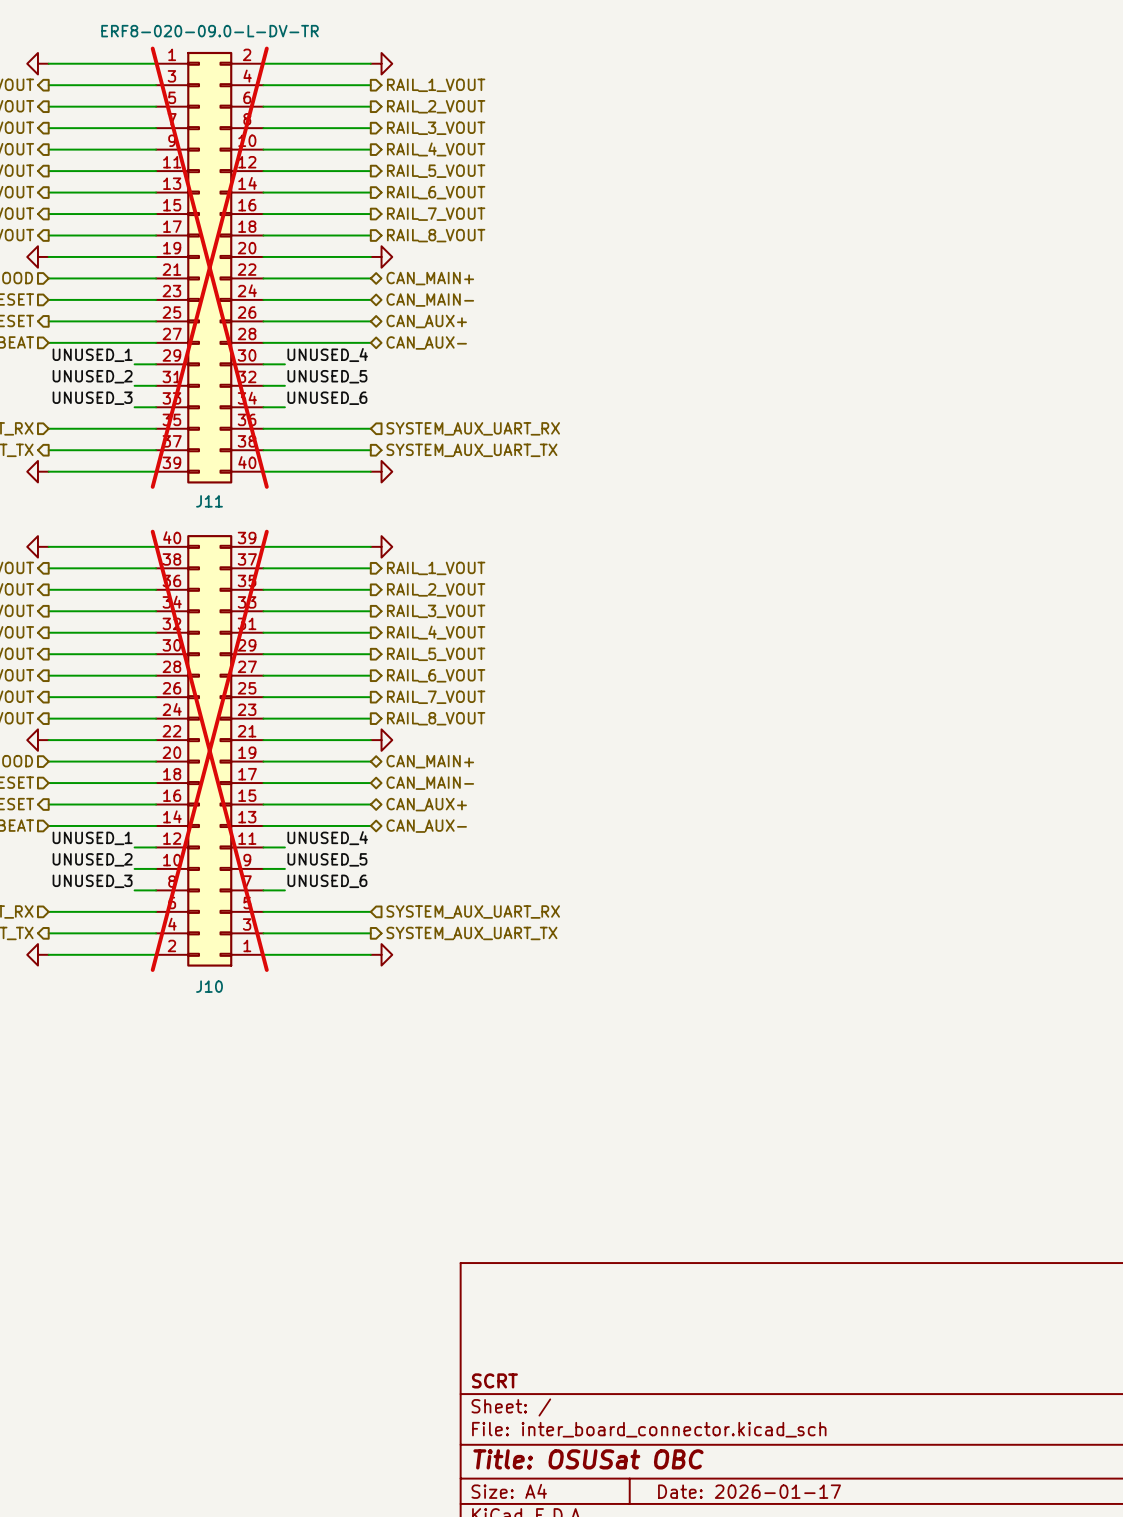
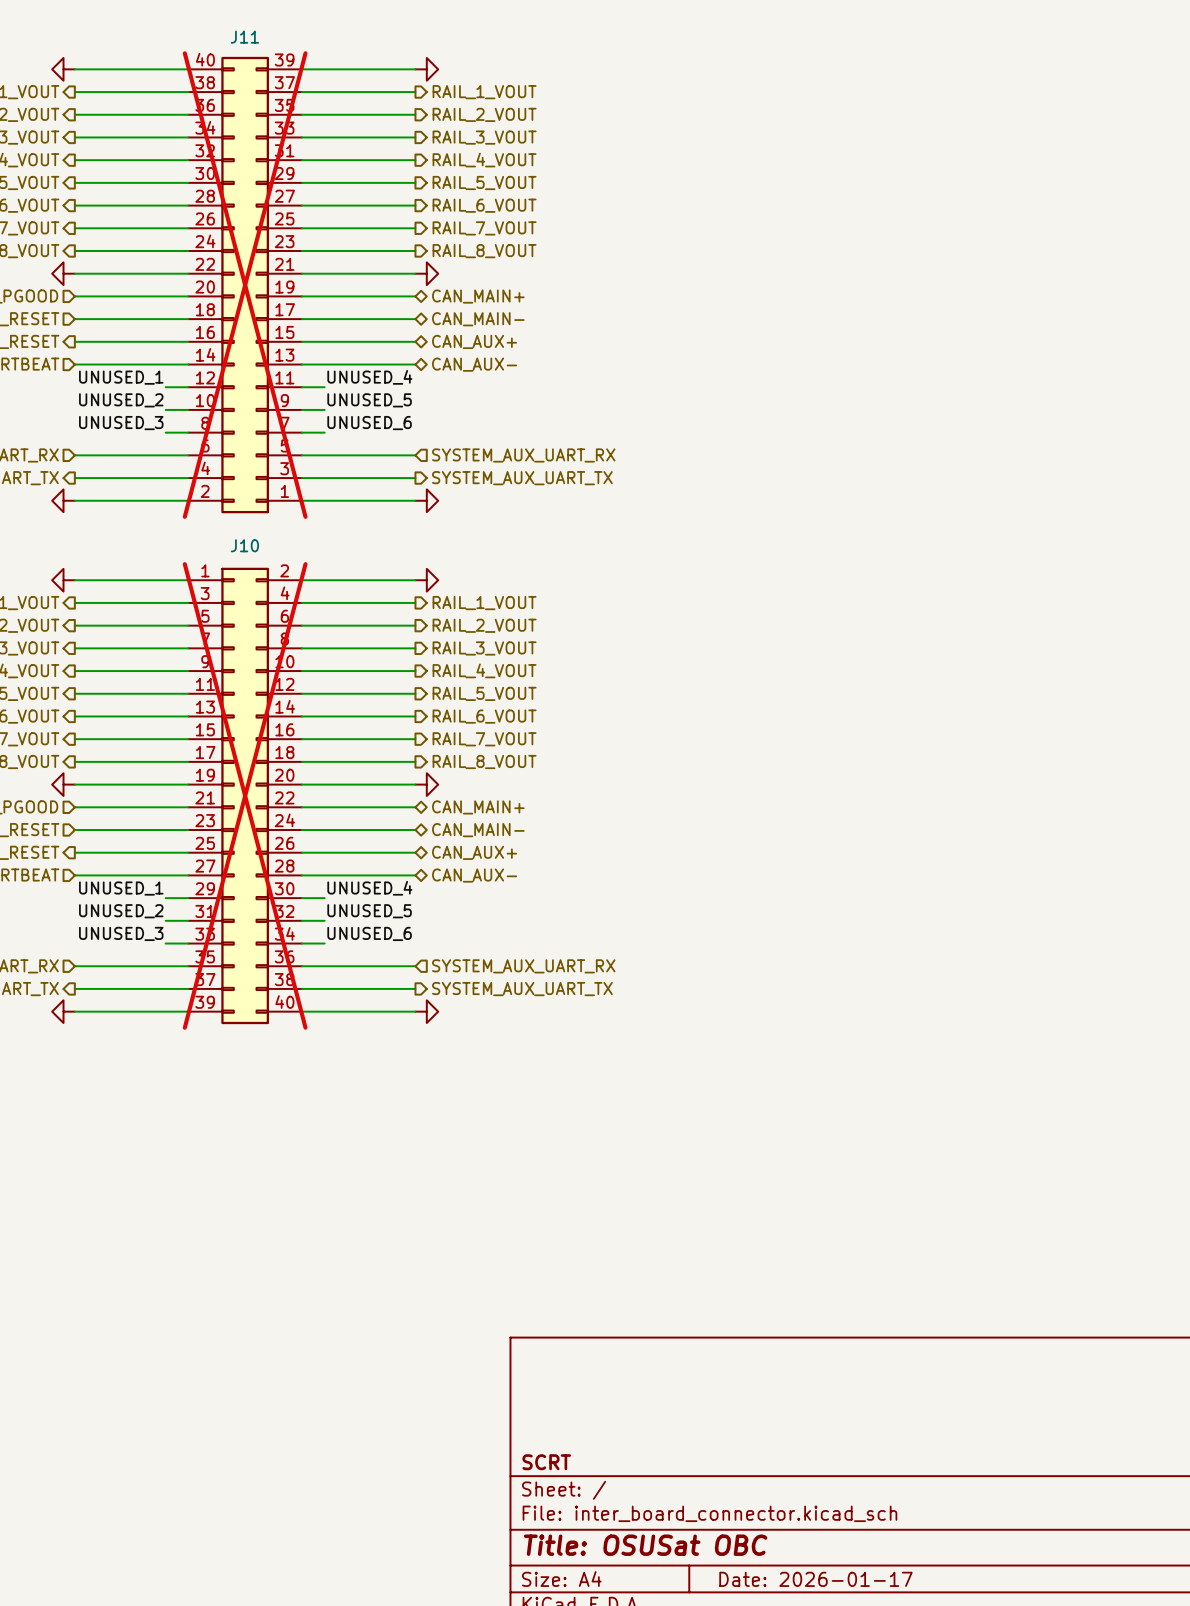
J11 value: ERF8-020-09.0-L-DV-TR (210, 31) -> none
J11 rotation: 0° (209, 267) -> 180° (245, 285)
J10 rotation: 0° (209, 750) -> 180° (245, 795)

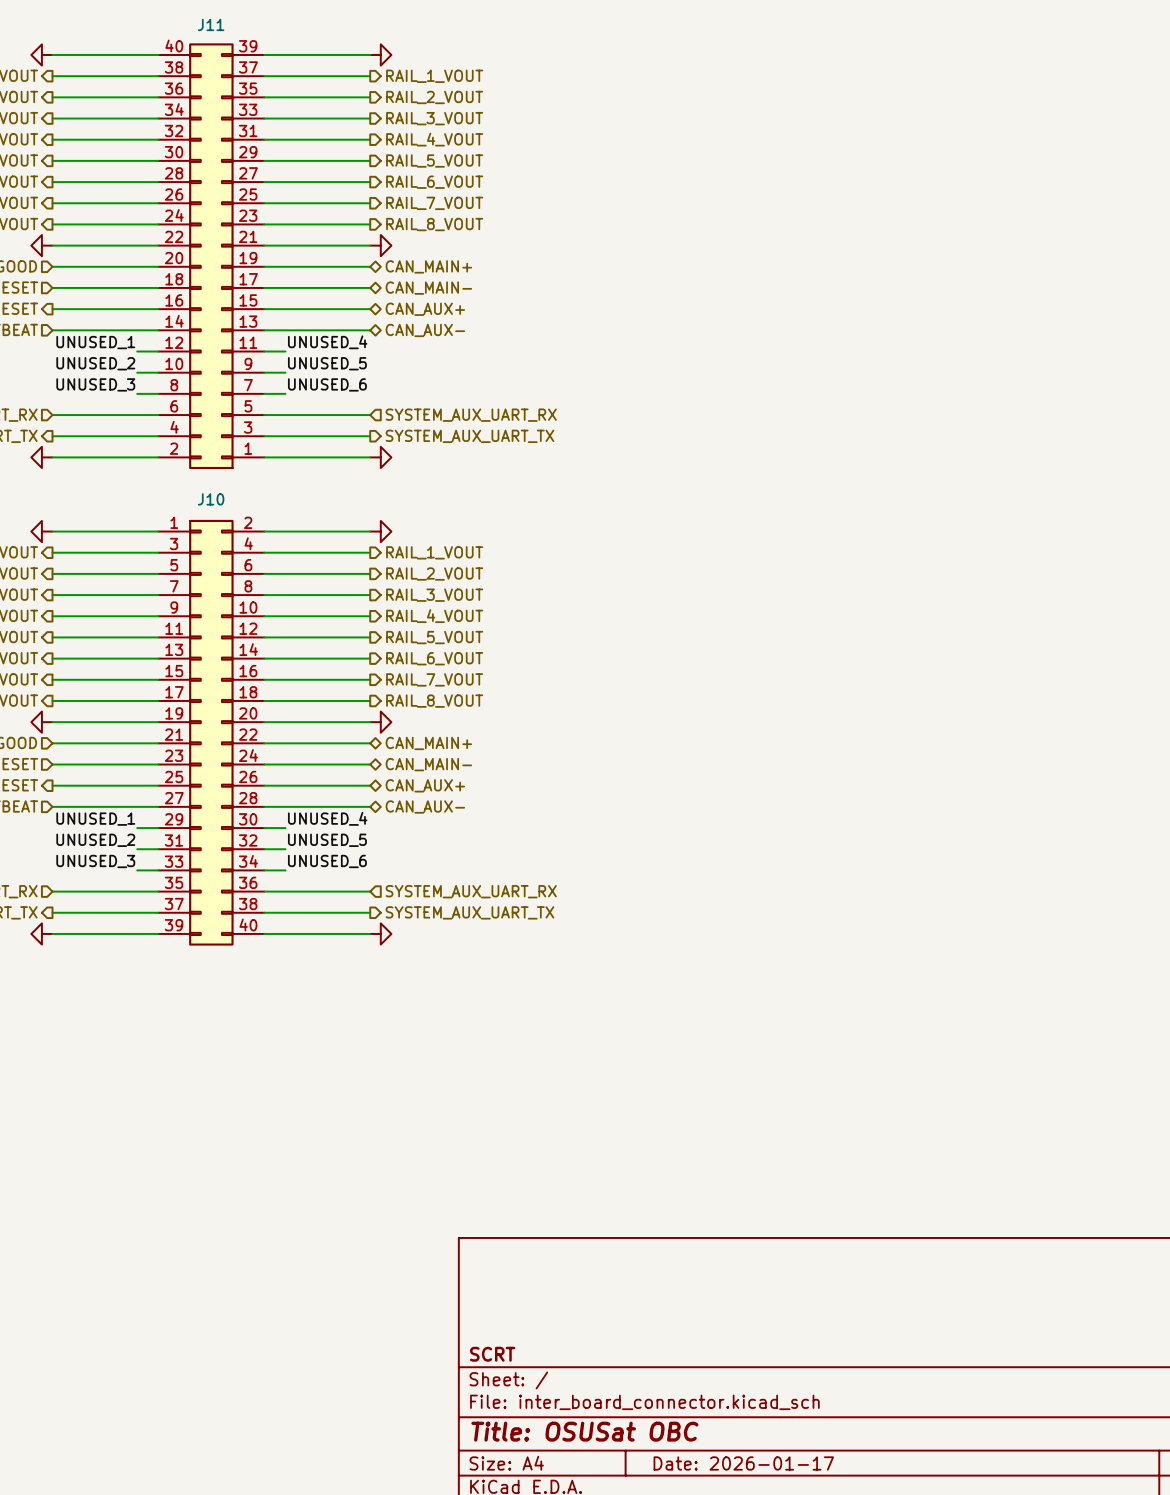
J11 do-not-place cross: (245, 285) -> none
J10 do-not-place cross: (245, 795) -> none

